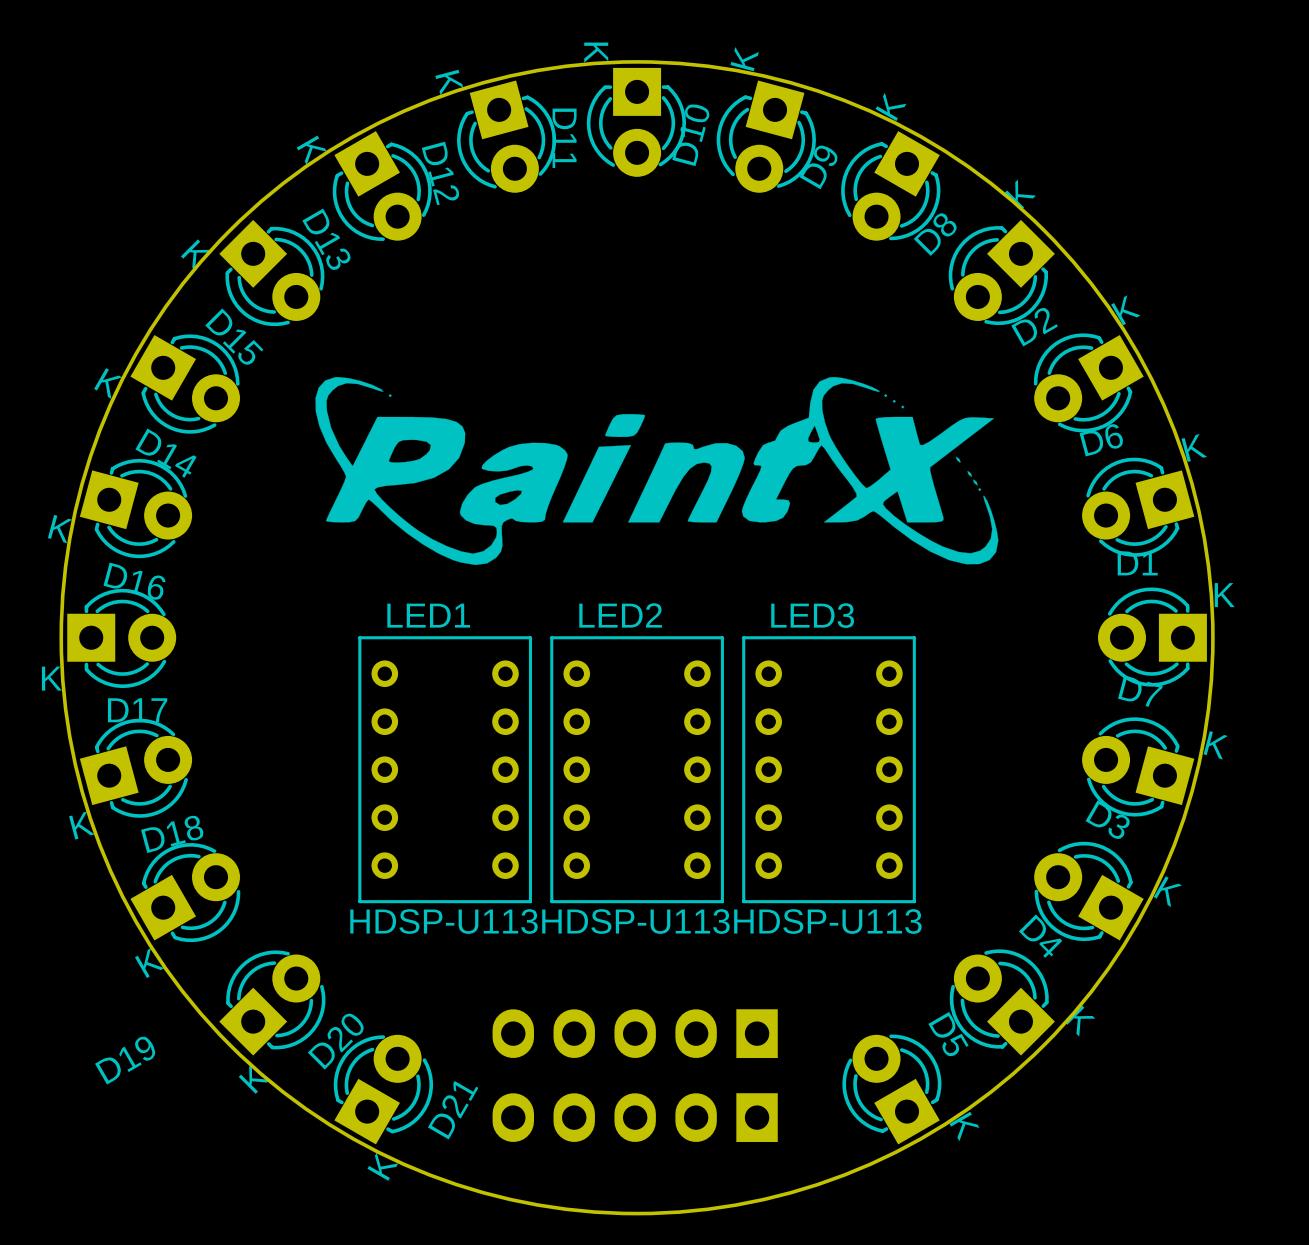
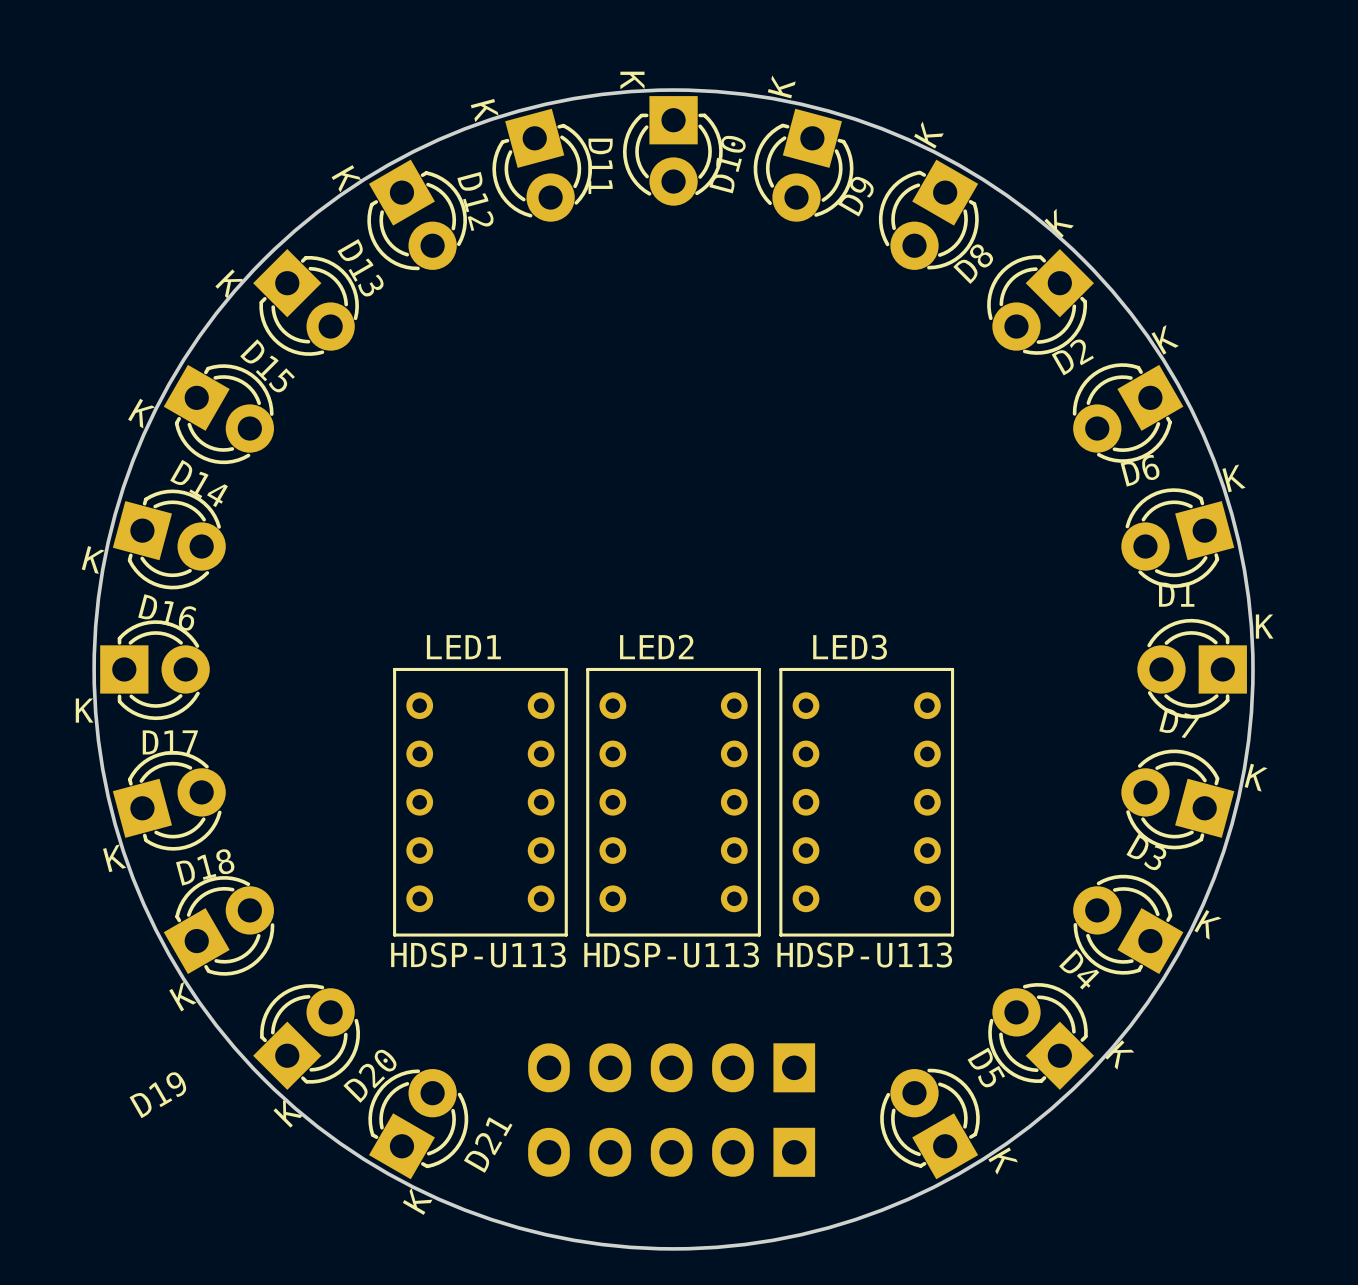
drawing: [315, 377, 999, 566] -> none

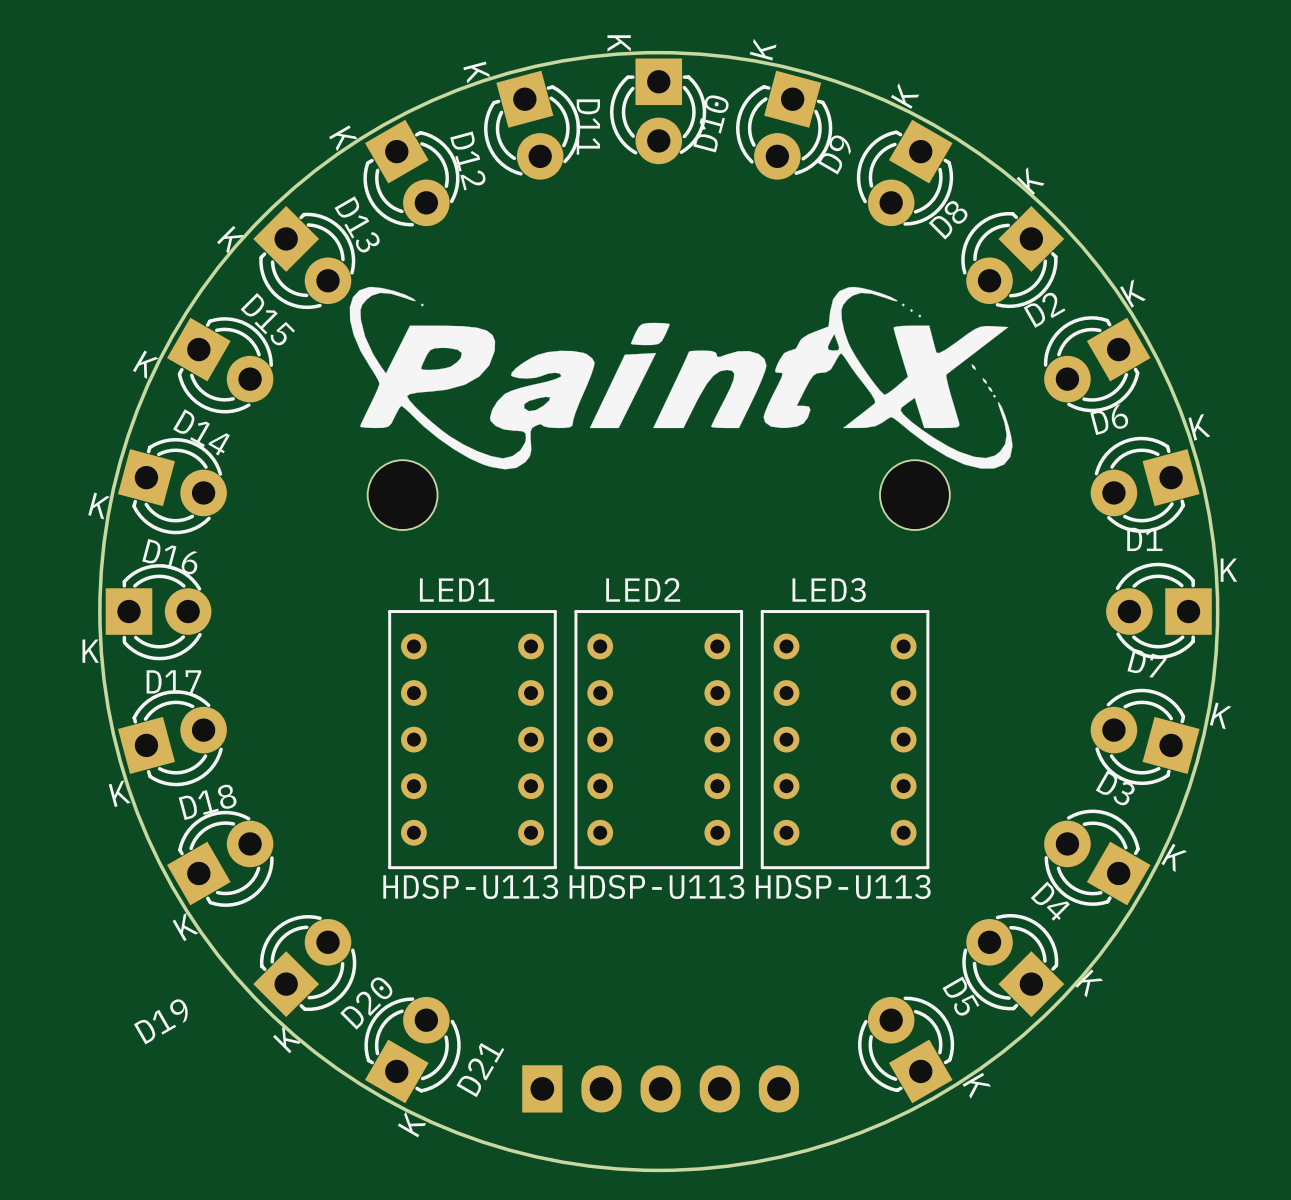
drawing: none -> [349, 286, 1013, 470]
part: none -> (402, 495)
part: none -> (914, 495)
part: (671, 1067) -> none
part rotation: 0° (671, 1152) -> 180° (660, 1088)

